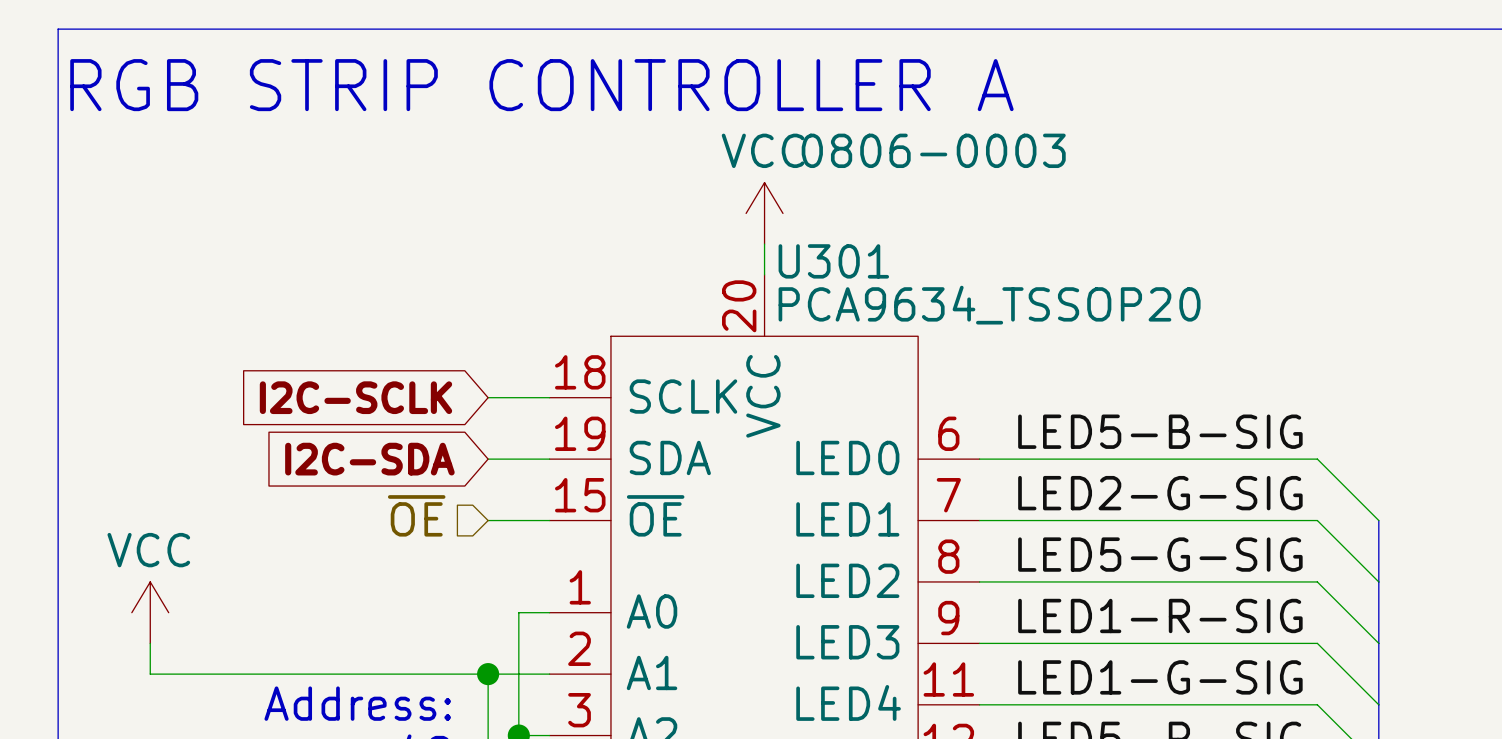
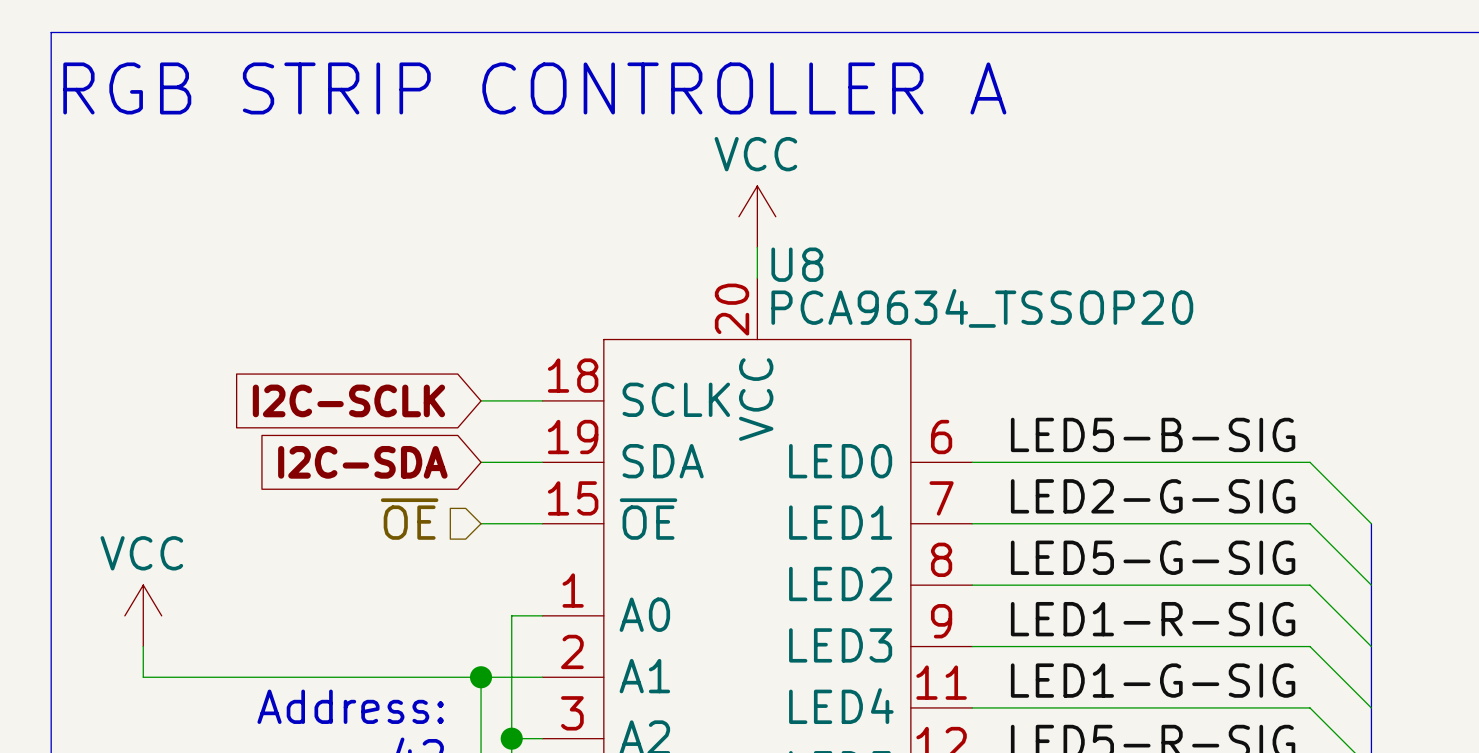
U301 text: 0806-0003 (933, 150) -> none
U301 name: U301 (833, 261) -> U8 (797, 264)

